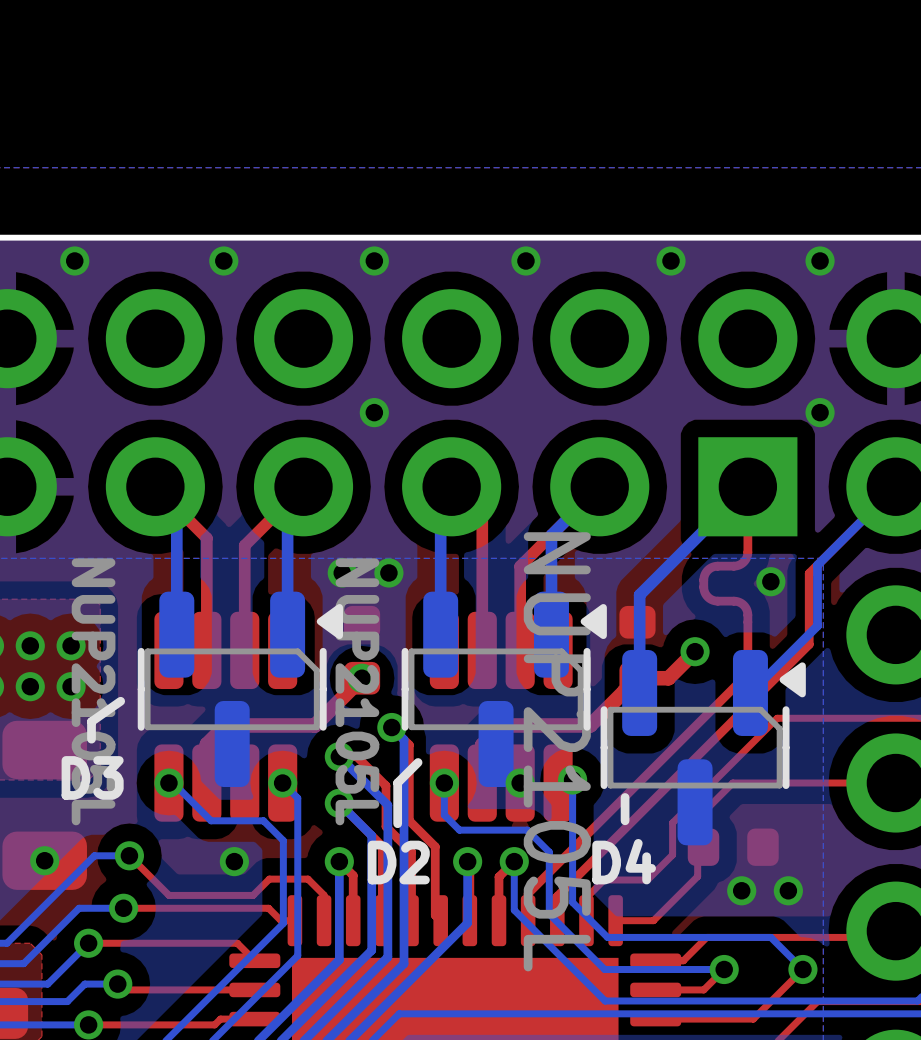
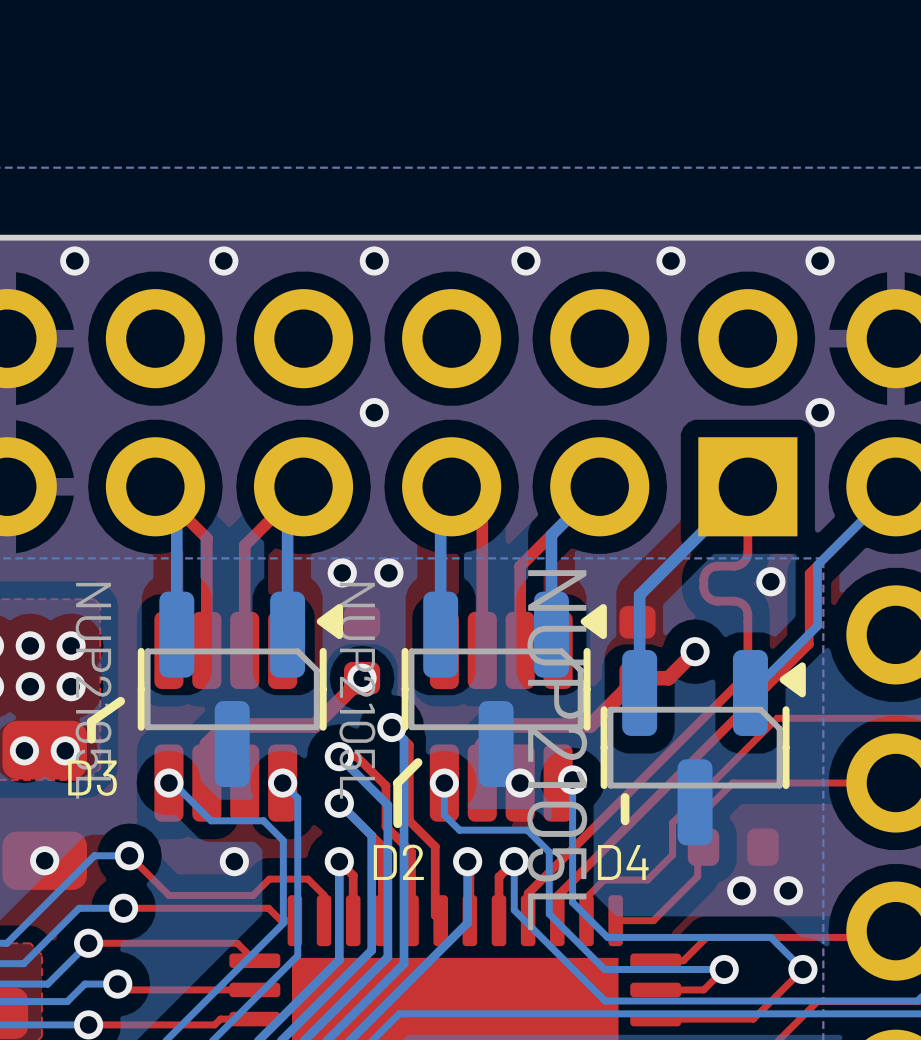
via: none -> (24, 750)
via: none -> (65, 750)

